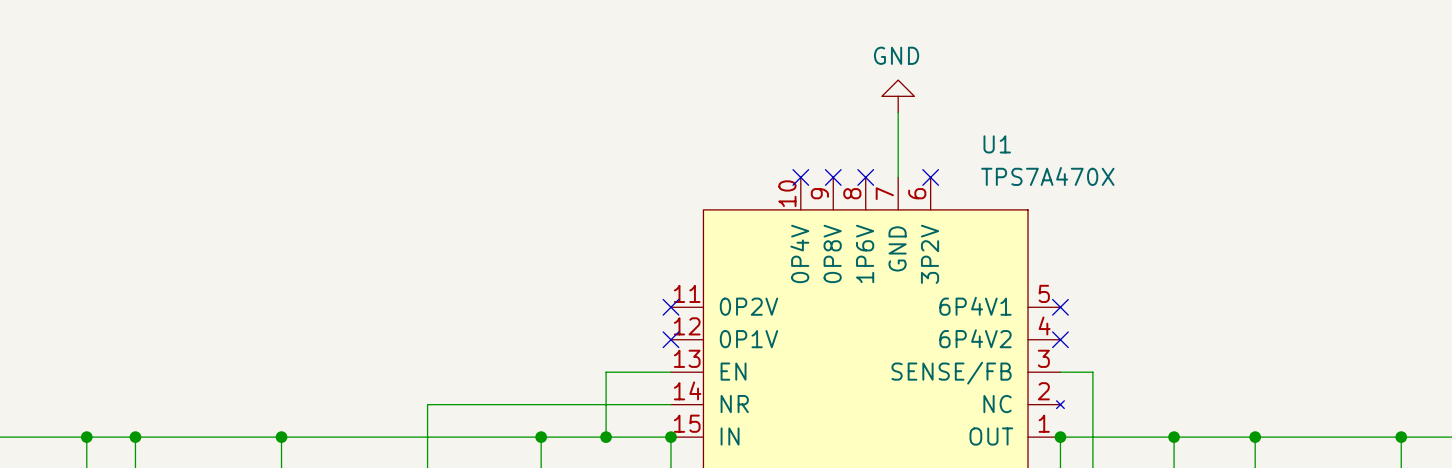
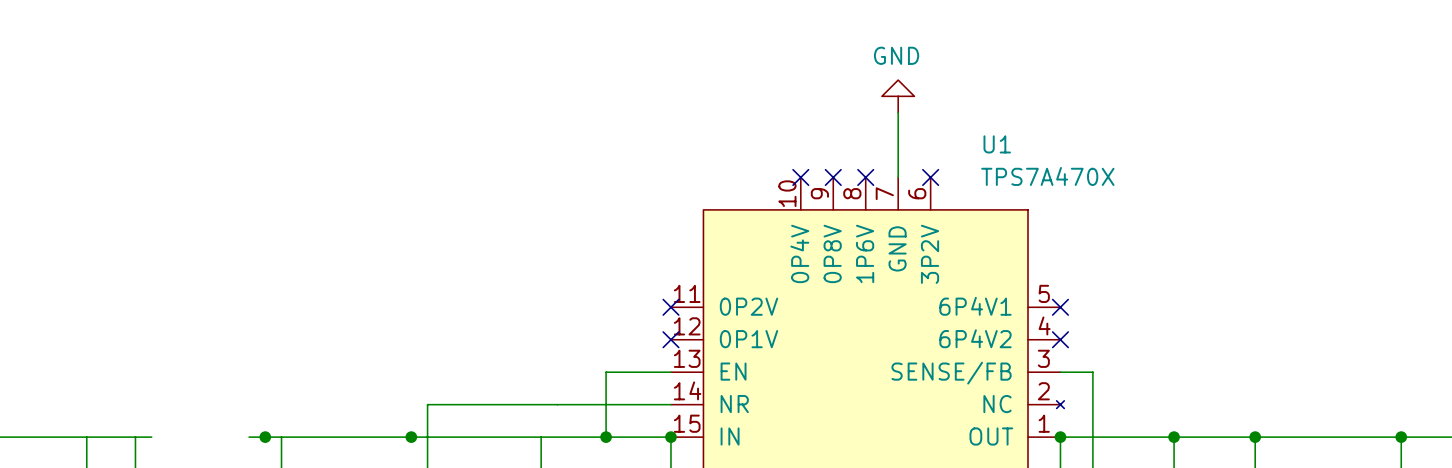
junction: (86, 437) -> none
junction: (135, 437) -> none
wire: (151, 437) (249, 437) -> none
junction position: (281, 437) -> (265, 437)
junction: none -> (411, 437)
junction: (541, 437) -> none

